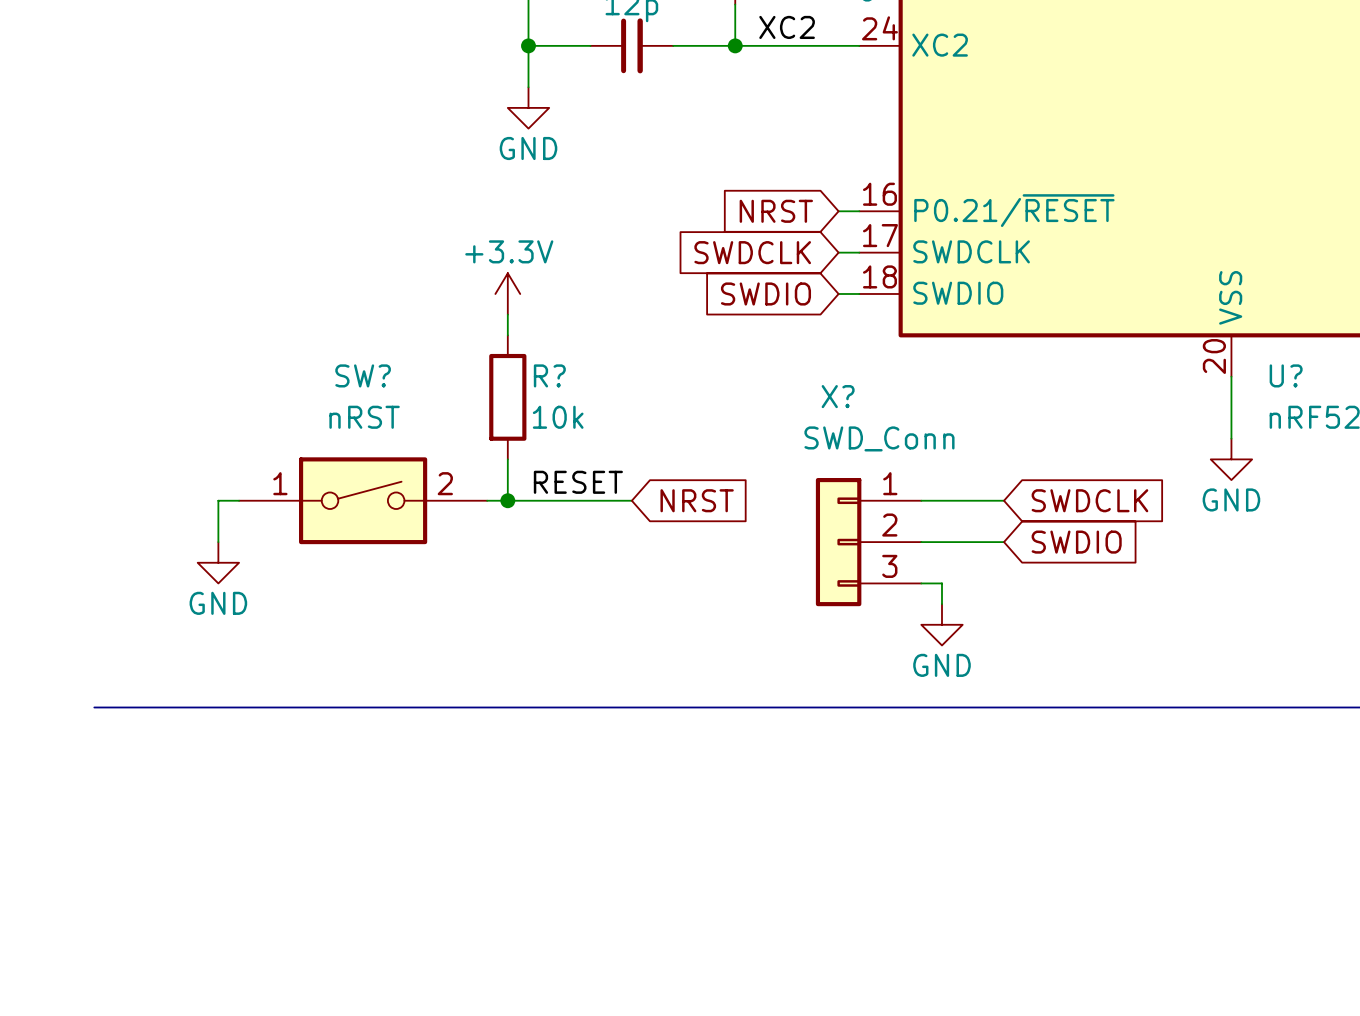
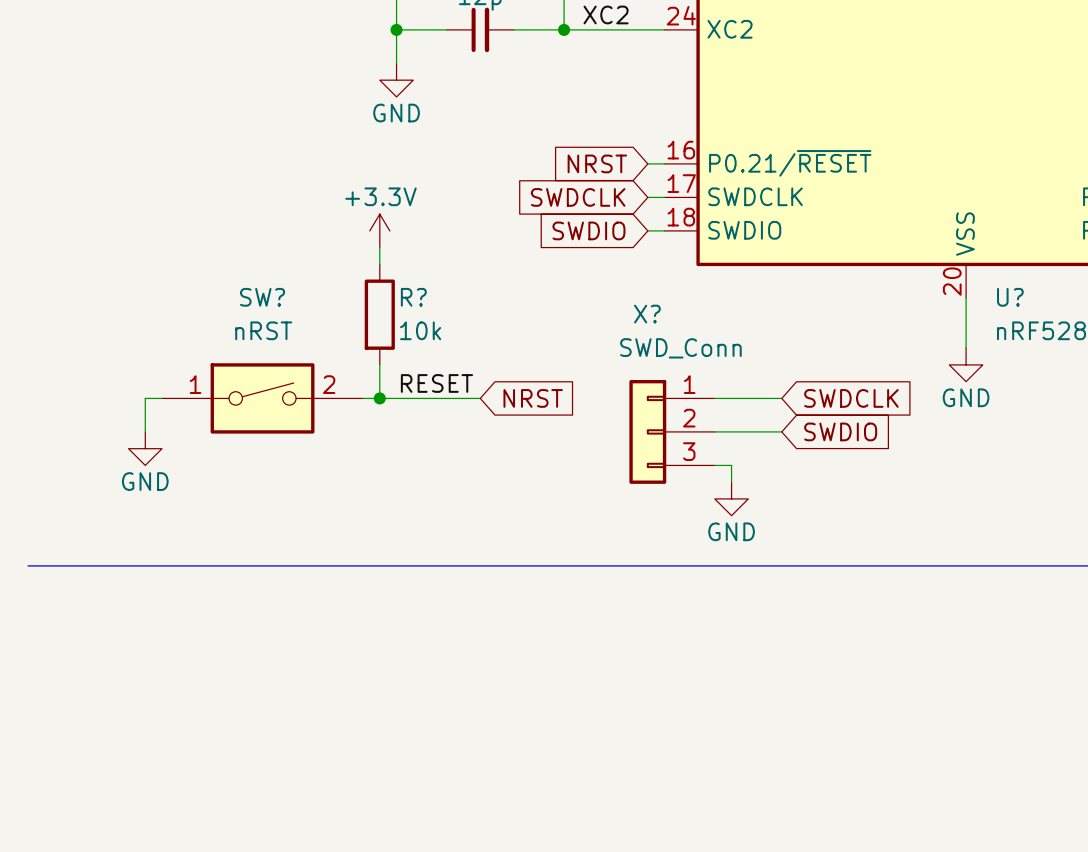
line: none -> (28, 565) (44, 565)

